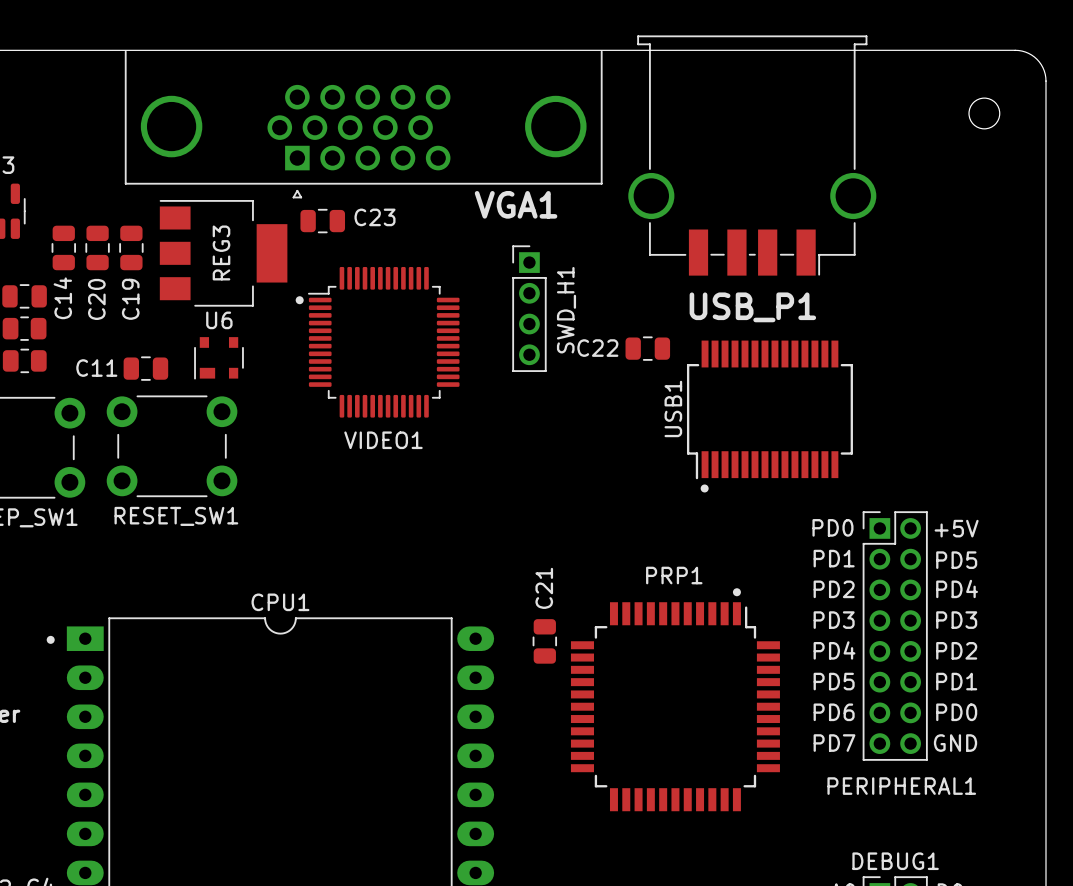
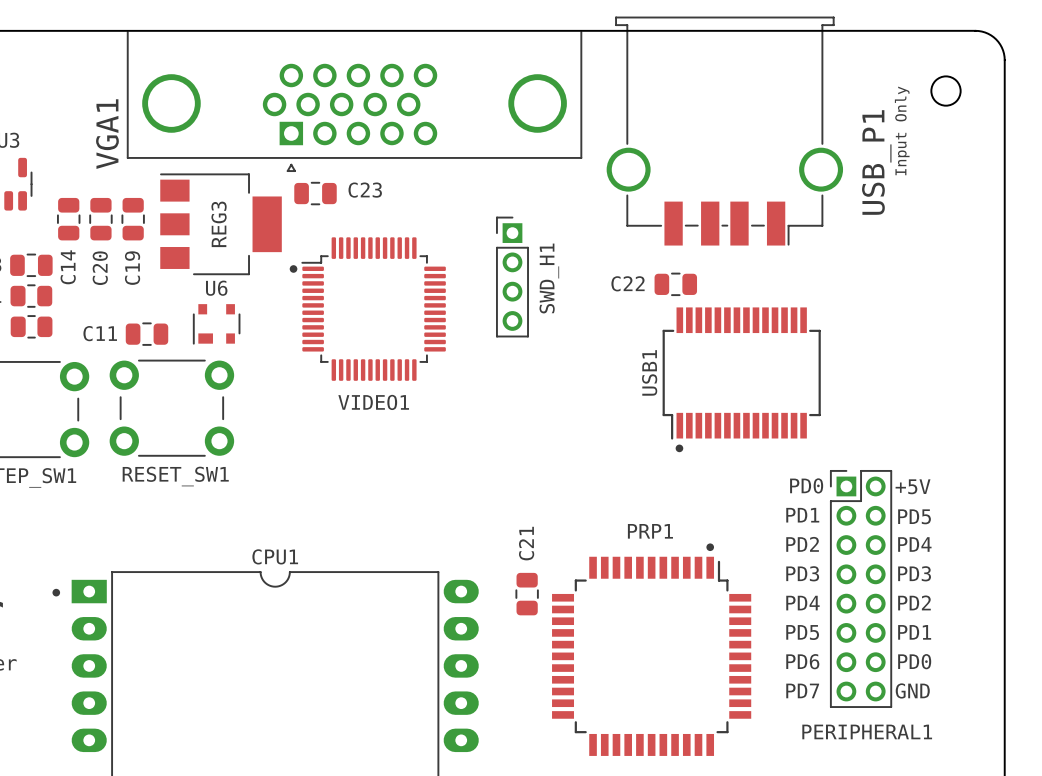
text: none -> Input Only (902, 130)
VGA1 name rotation: 0° (516, 204) -> 90° counterclockwise (107, 134)
VGA1 name position: VGA1 (516, 204) -> VGA1 (107, 134)
USB_P1 name rotation: 0° (752, 307) -> 90° counterclockwise (876, 162)
USB_P1 name position: USB_P1 (752, 307) -> USB_P1 (876, 162)
C22 position: (647, 348) -> (675, 284)

